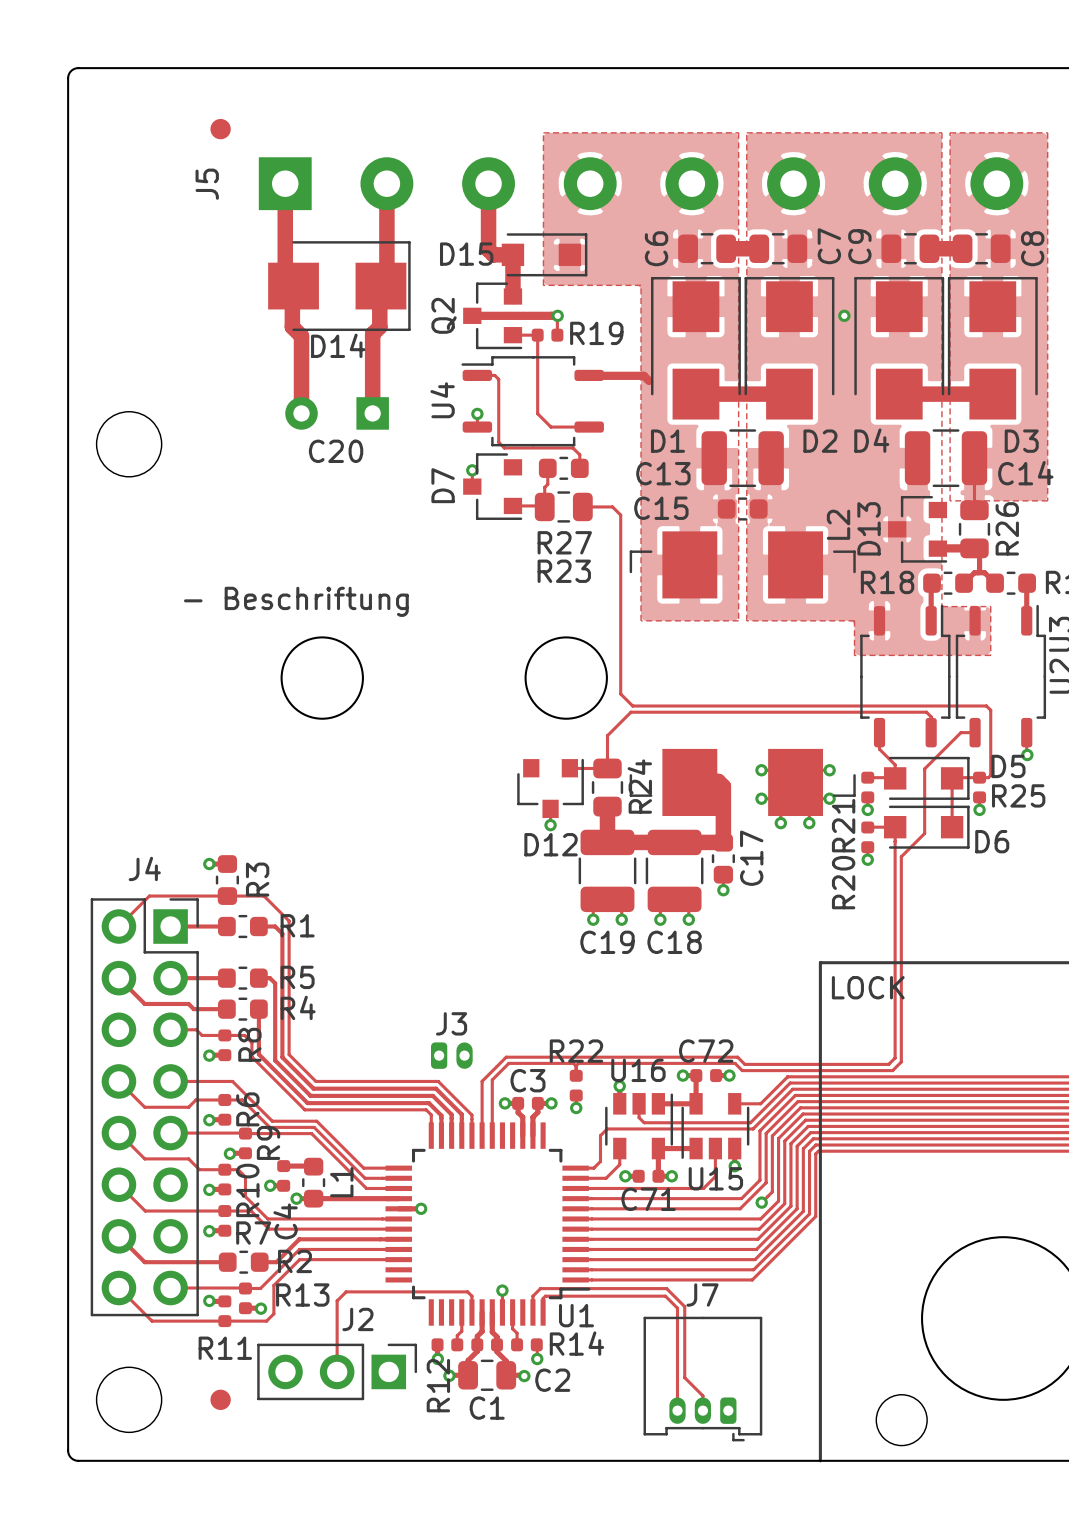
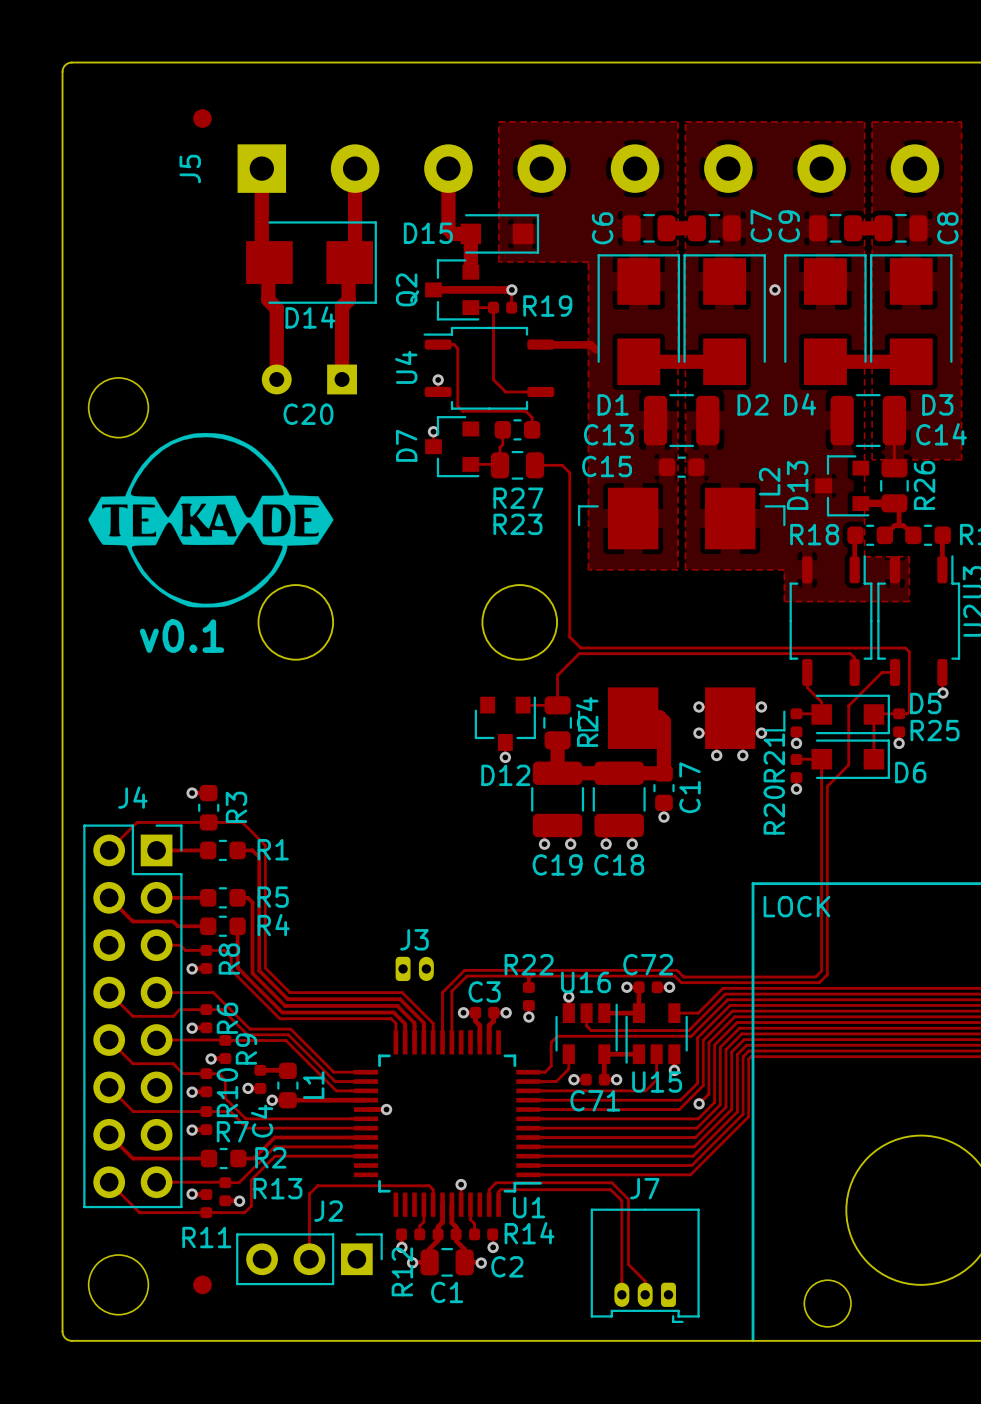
drawing: none -> [88, 432, 334, 608]
text: - Beschriftung (296, 601) -> none
text: none -> v0.1 (181, 636)

